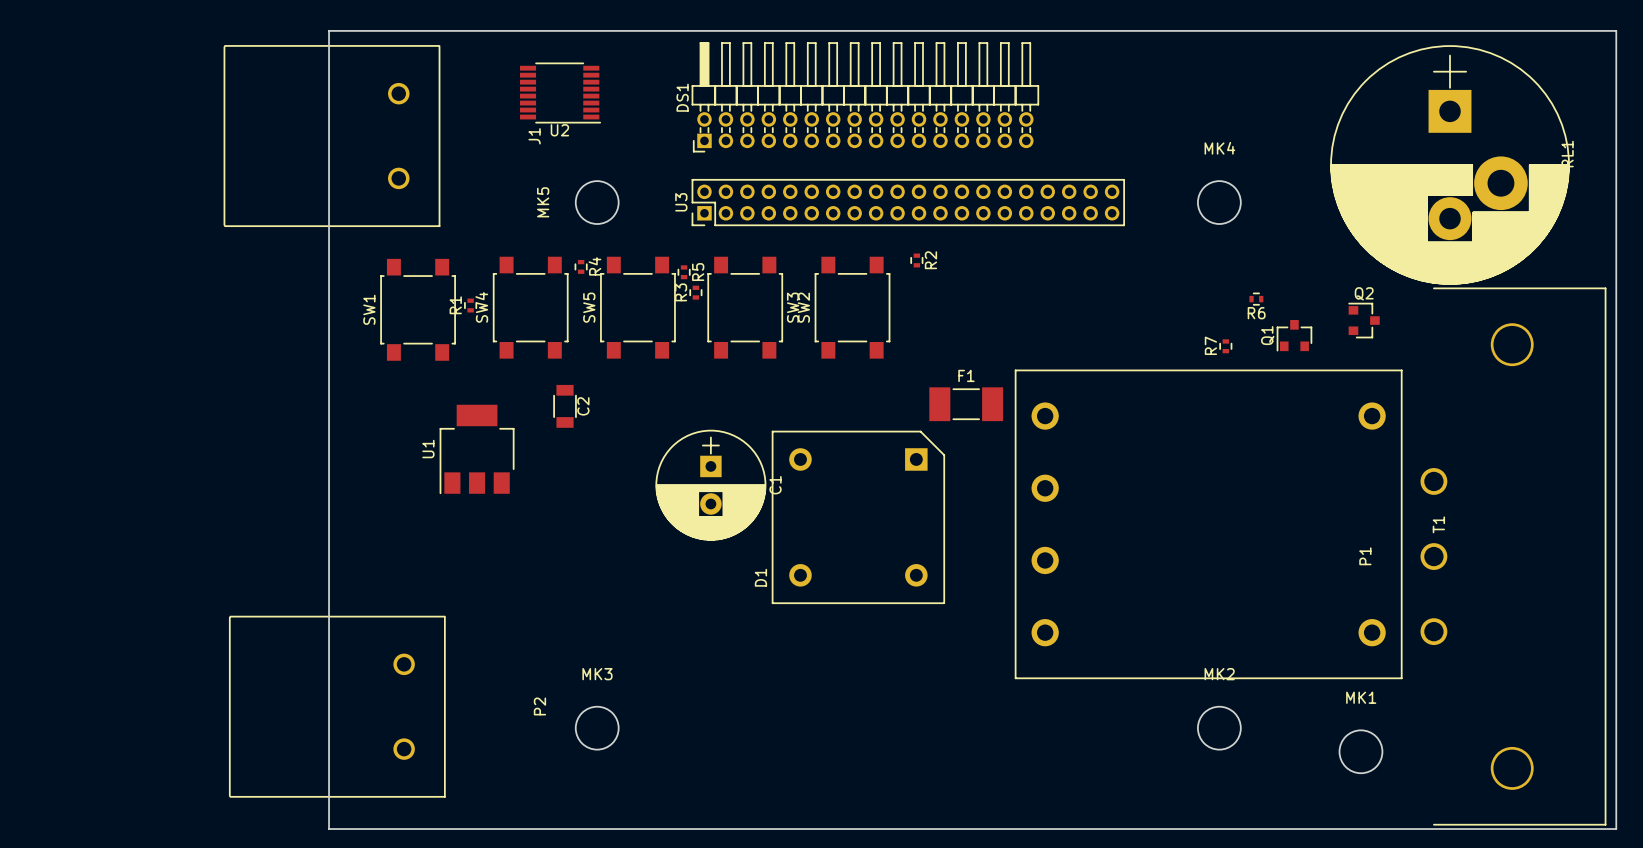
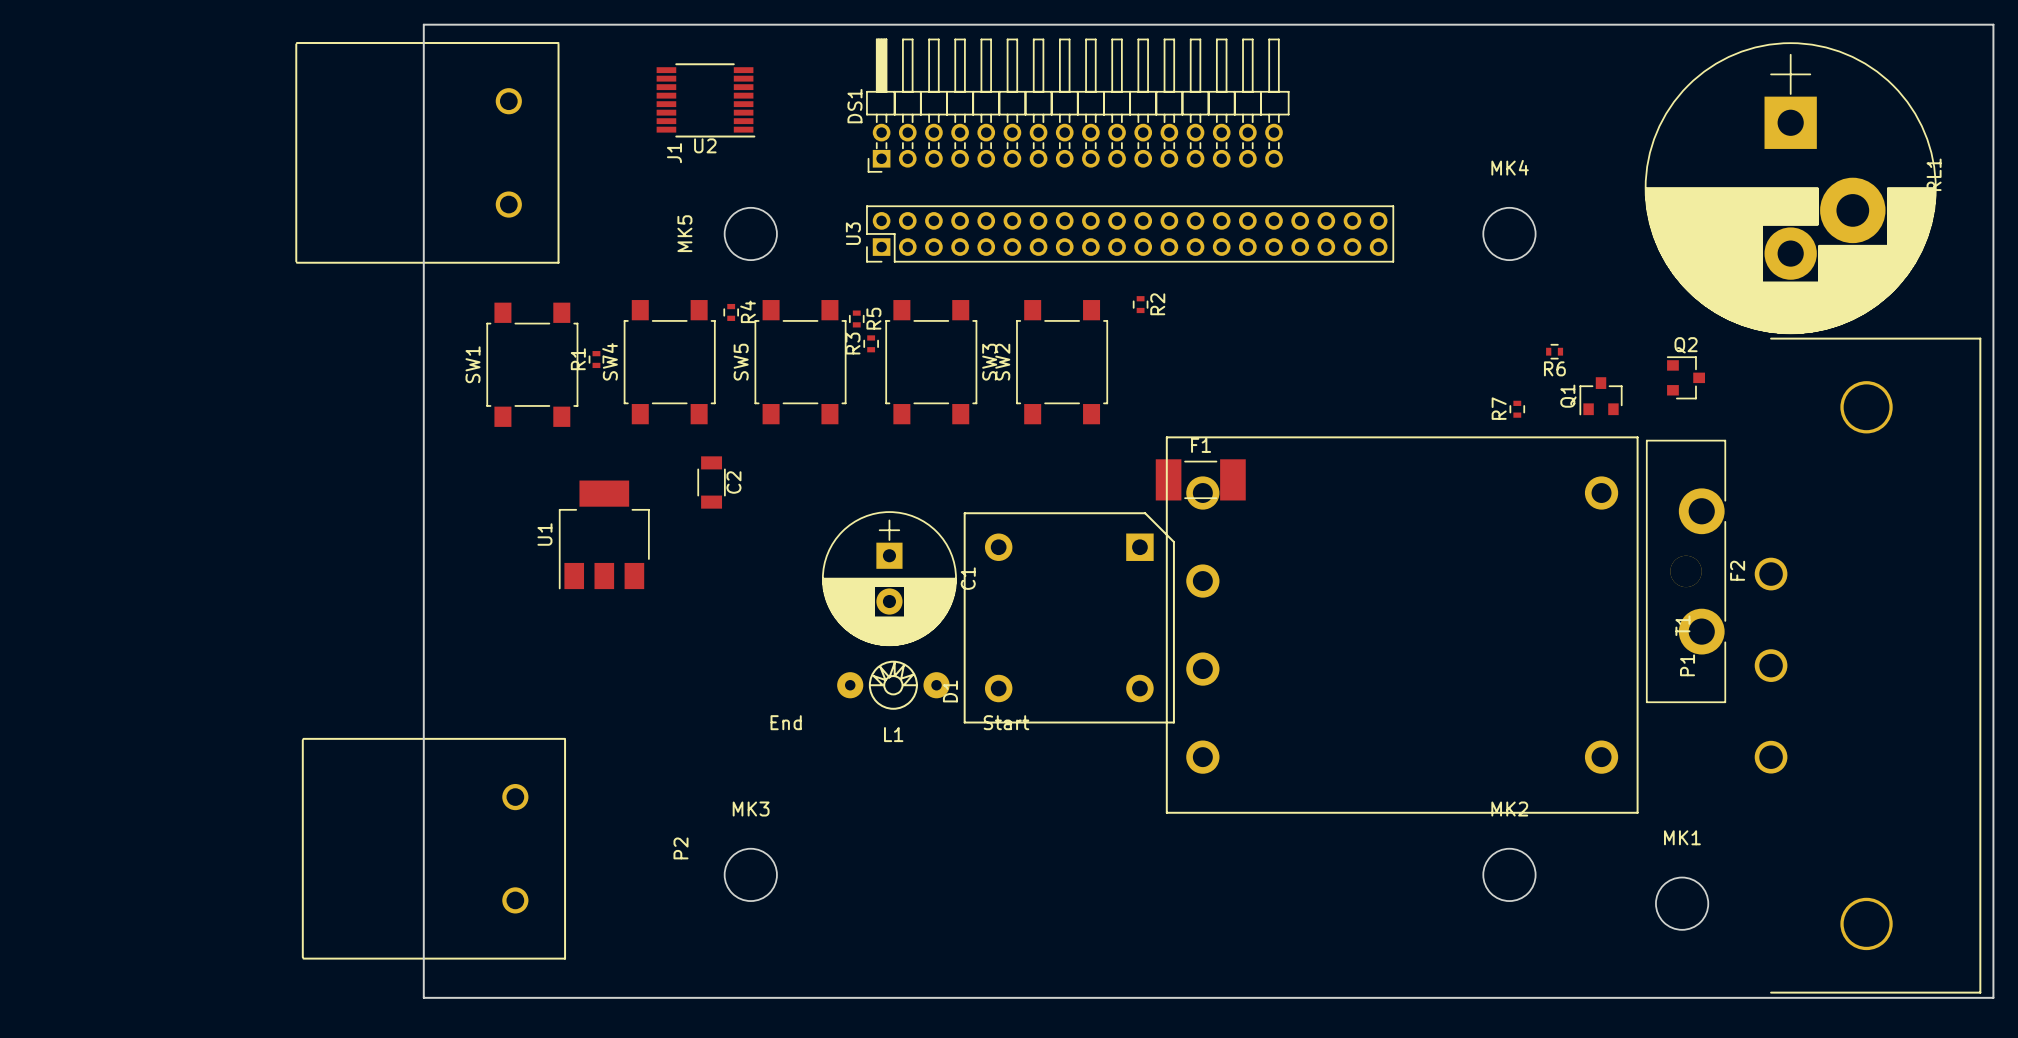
F2: none -> (1686, 571)
T1 position: (1208, 524) -> (1402, 625)
L1: none -> (893, 685)

